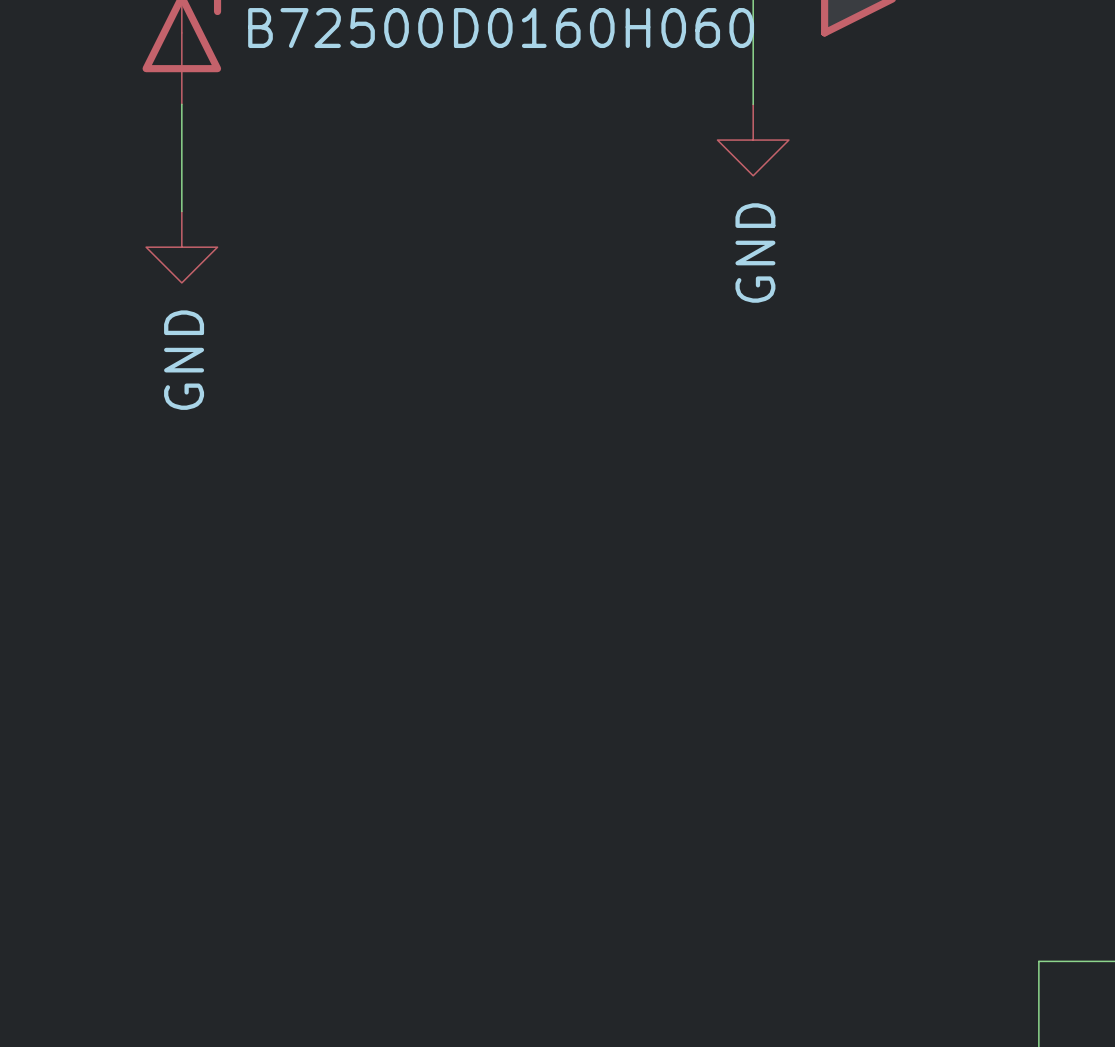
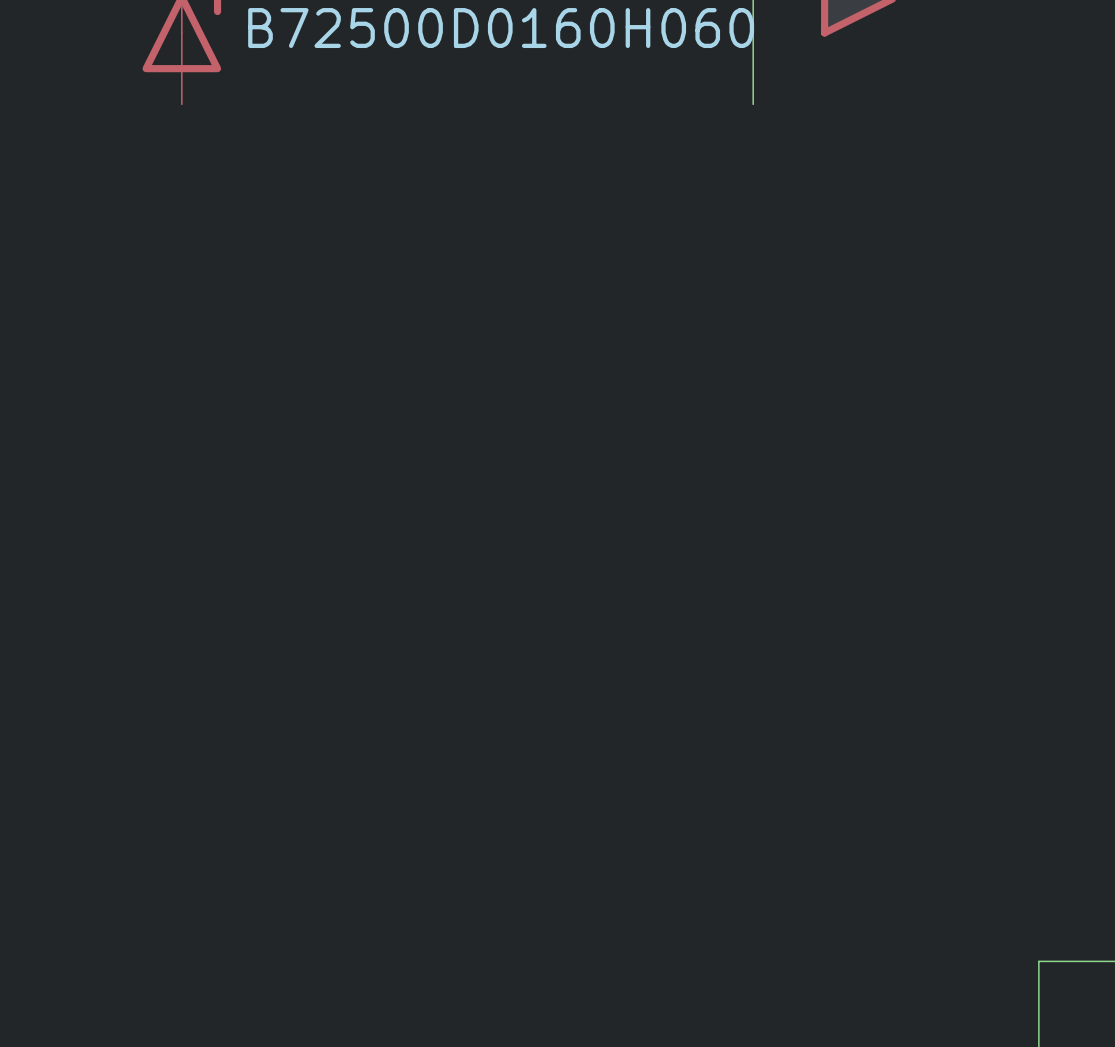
wire: (181, 104) (181, 211) -> none
power symbol: GND (753, 140) -> none
power symbol: GND (181, 247) -> none

